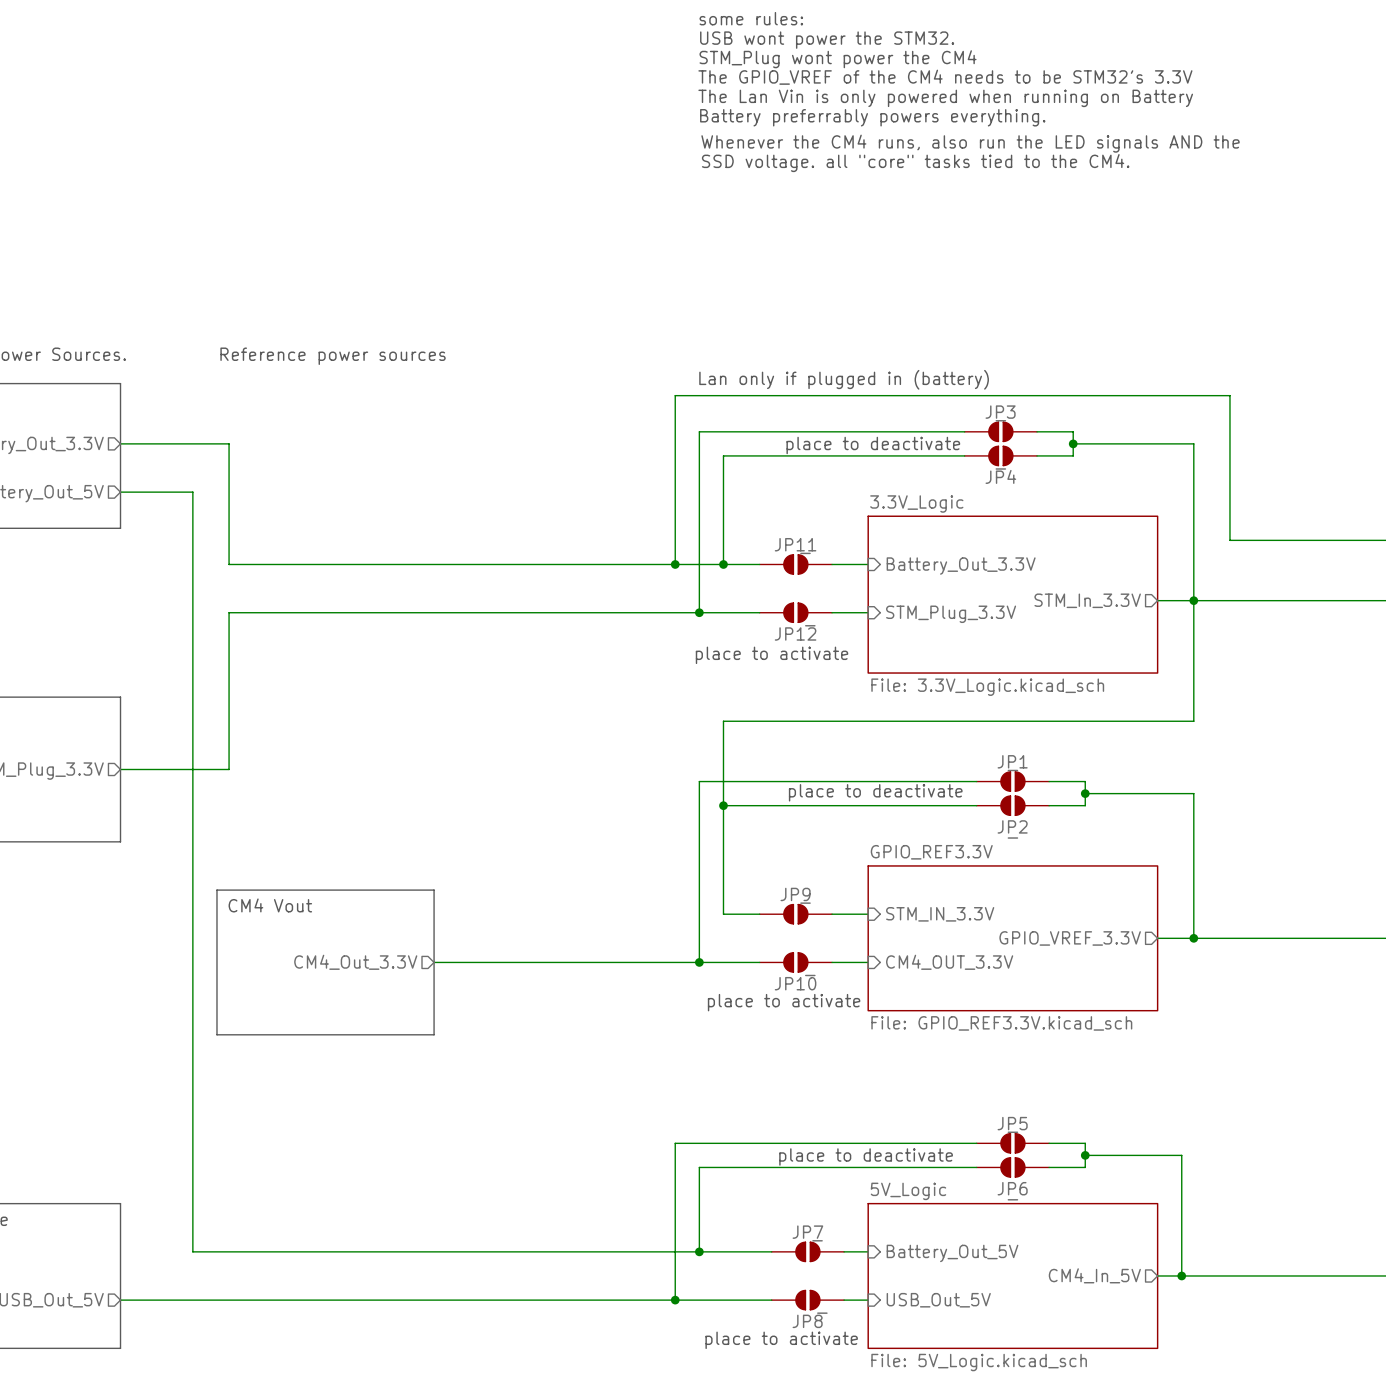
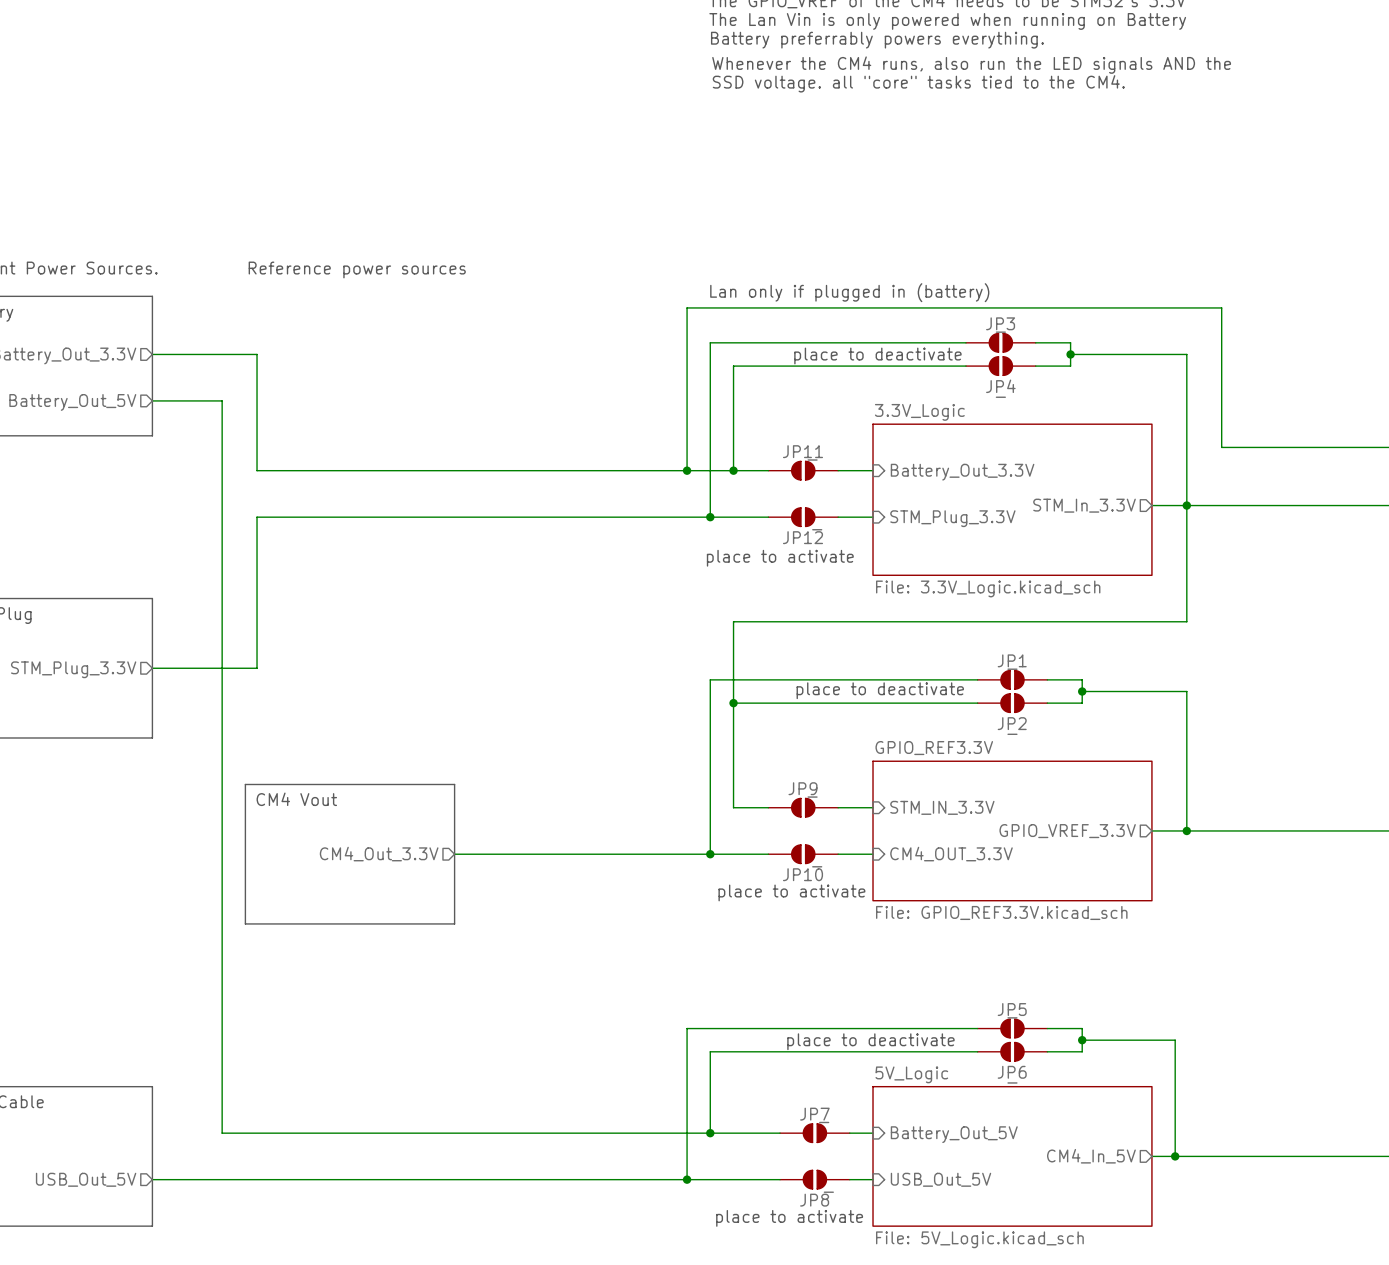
JP3 value position: - (1000, 420) -> - (1000, 397)
JP4 value position: - (1000, 468) -> - (1000, 332)

